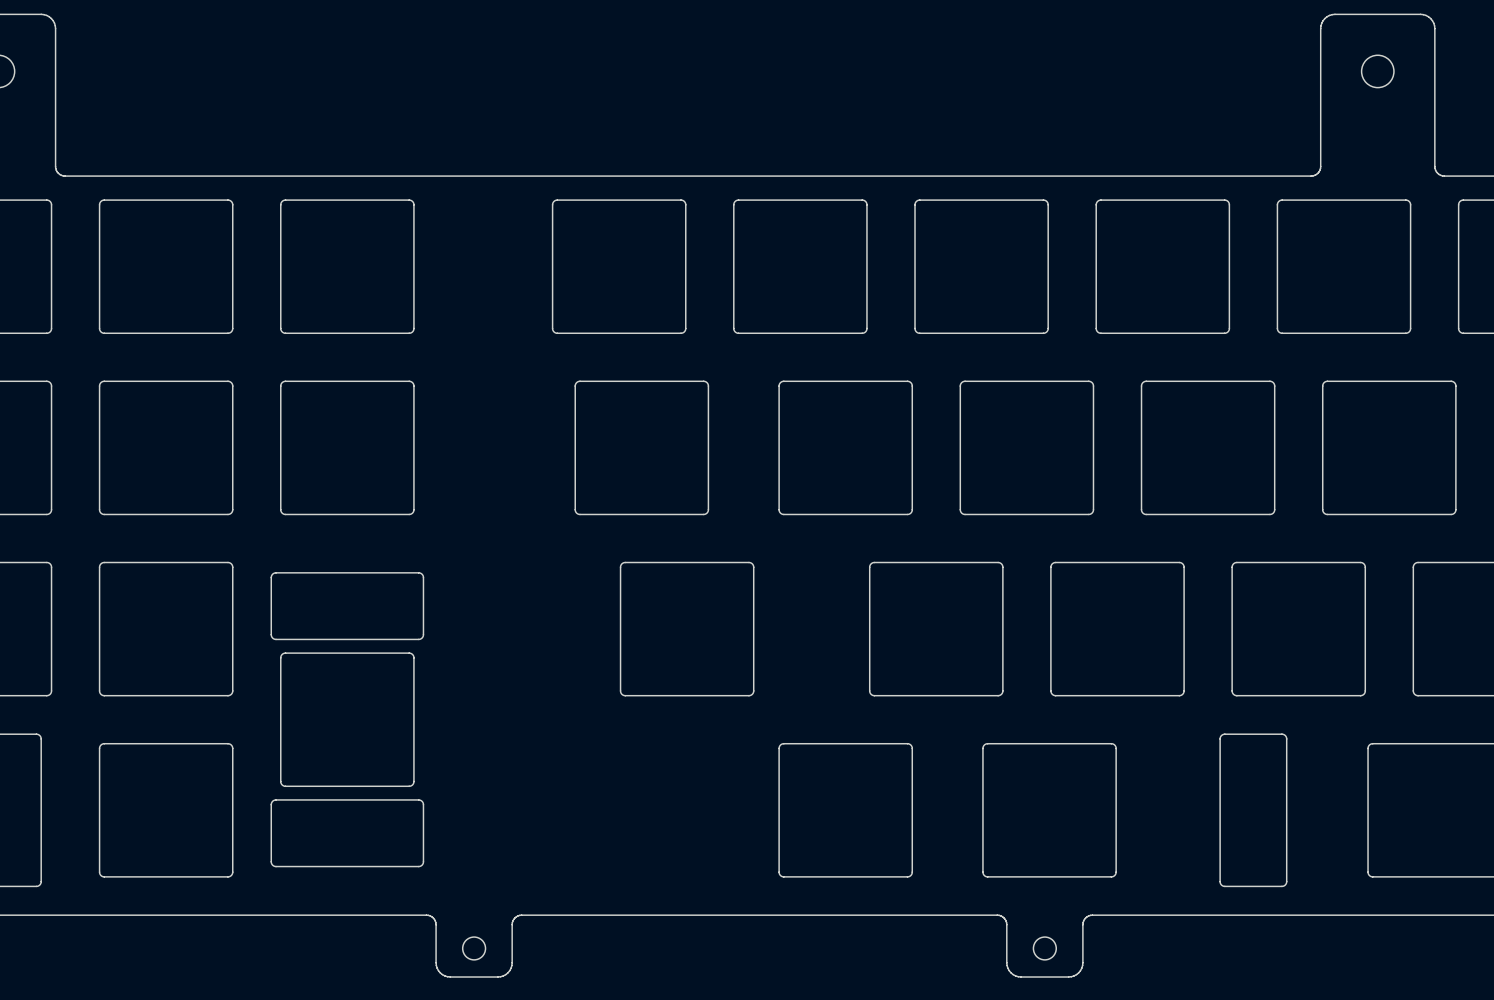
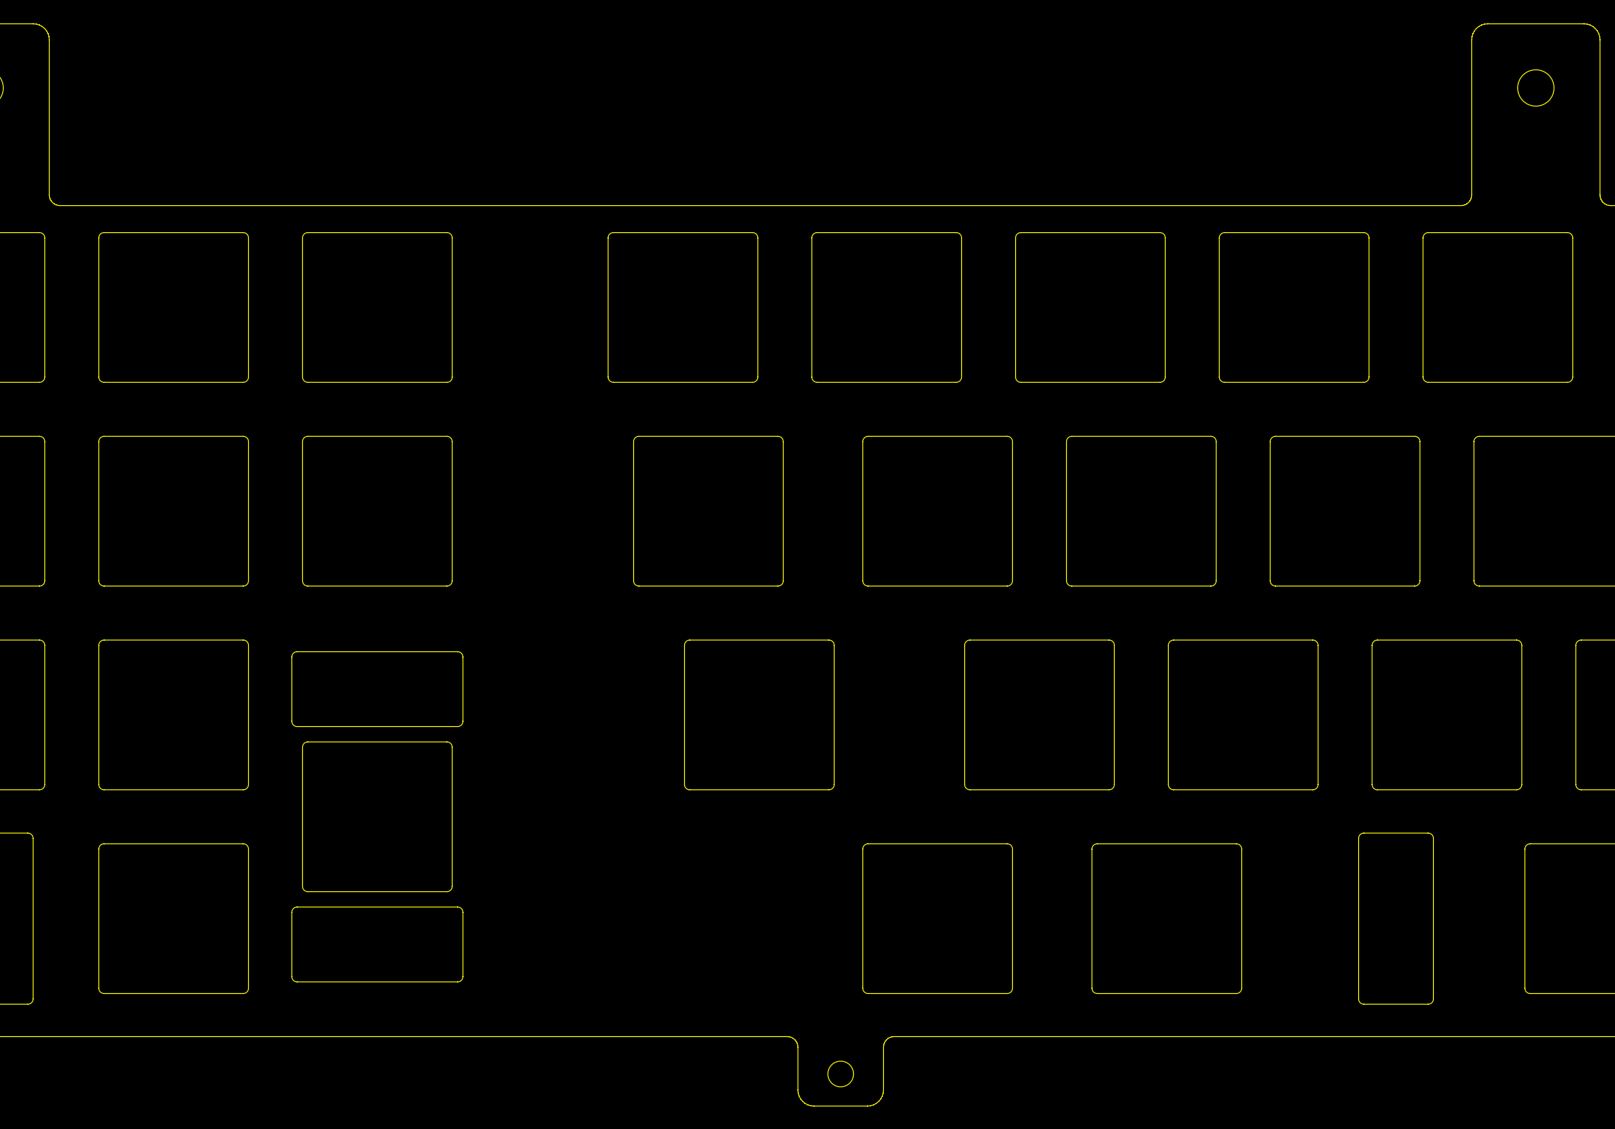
board edge: (426, 915) (431, 916) (435, 922) (437, 968) (442, 974) (450, 977) (497, 977) (507, 972) (512, 962) (512, 922) (516, 916) (521, 915) -> (466, 1036) (573, 1036)
board edge: (711, 915) (807, 915) -> (787, 1036) (793, 1038) (797, 1045) (799, 1096) (805, 1103) (813, 1106) (867, 1106) (878, 1101) (883, 1090) (883, 1045) (888, 1038) (894, 1036)
board edge: (997, 915) (1002, 916) (1006, 922) (1007, 968) (1013, 974) (1021, 977) (1068, 977) (1078, 972) (1082, 962) (1083, 922) (1087, 916) (1092, 915) -> (1108, 1036) (1215, 1036)
round board edge: [462, 936, 487, 961] -> none
round board edge: none -> [827, 1060, 855, 1088]
round board edge: [1032, 936, 1057, 961] -> none

